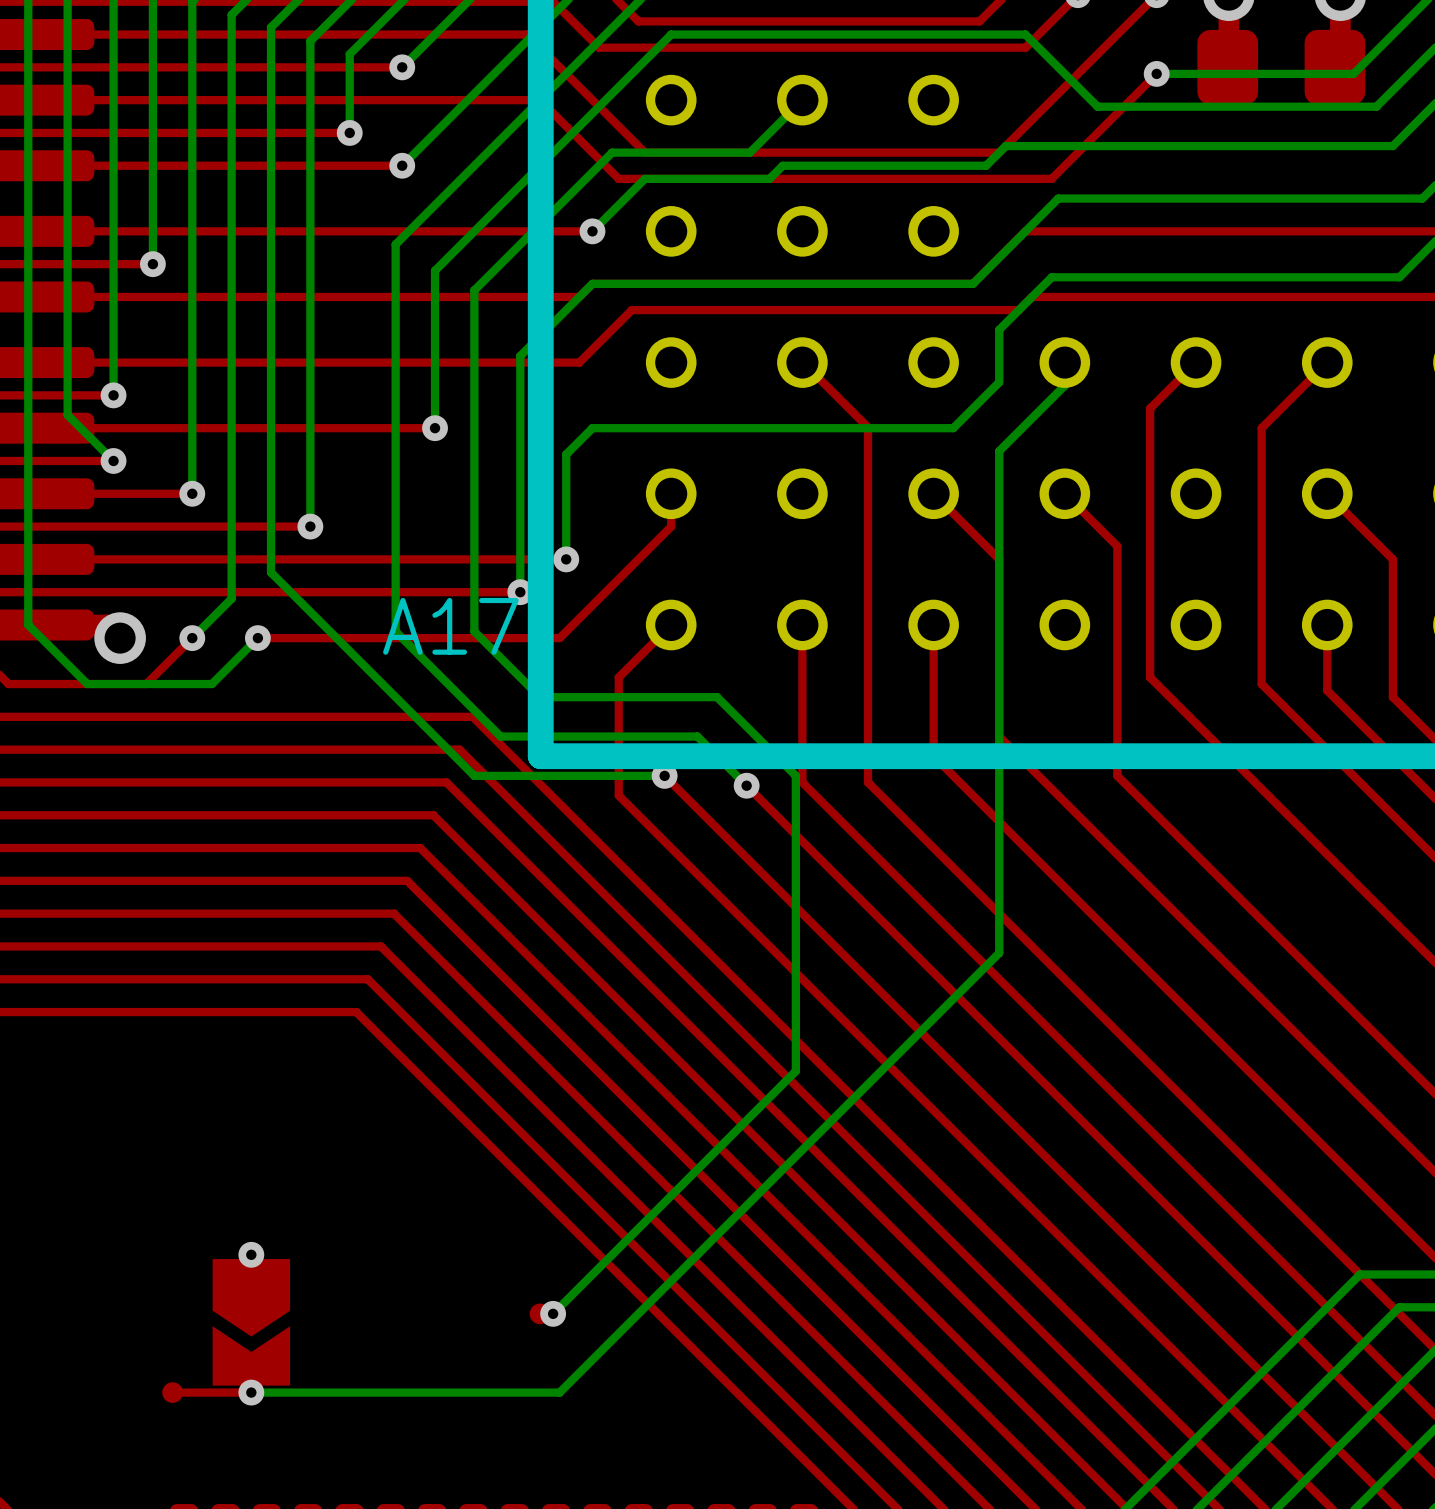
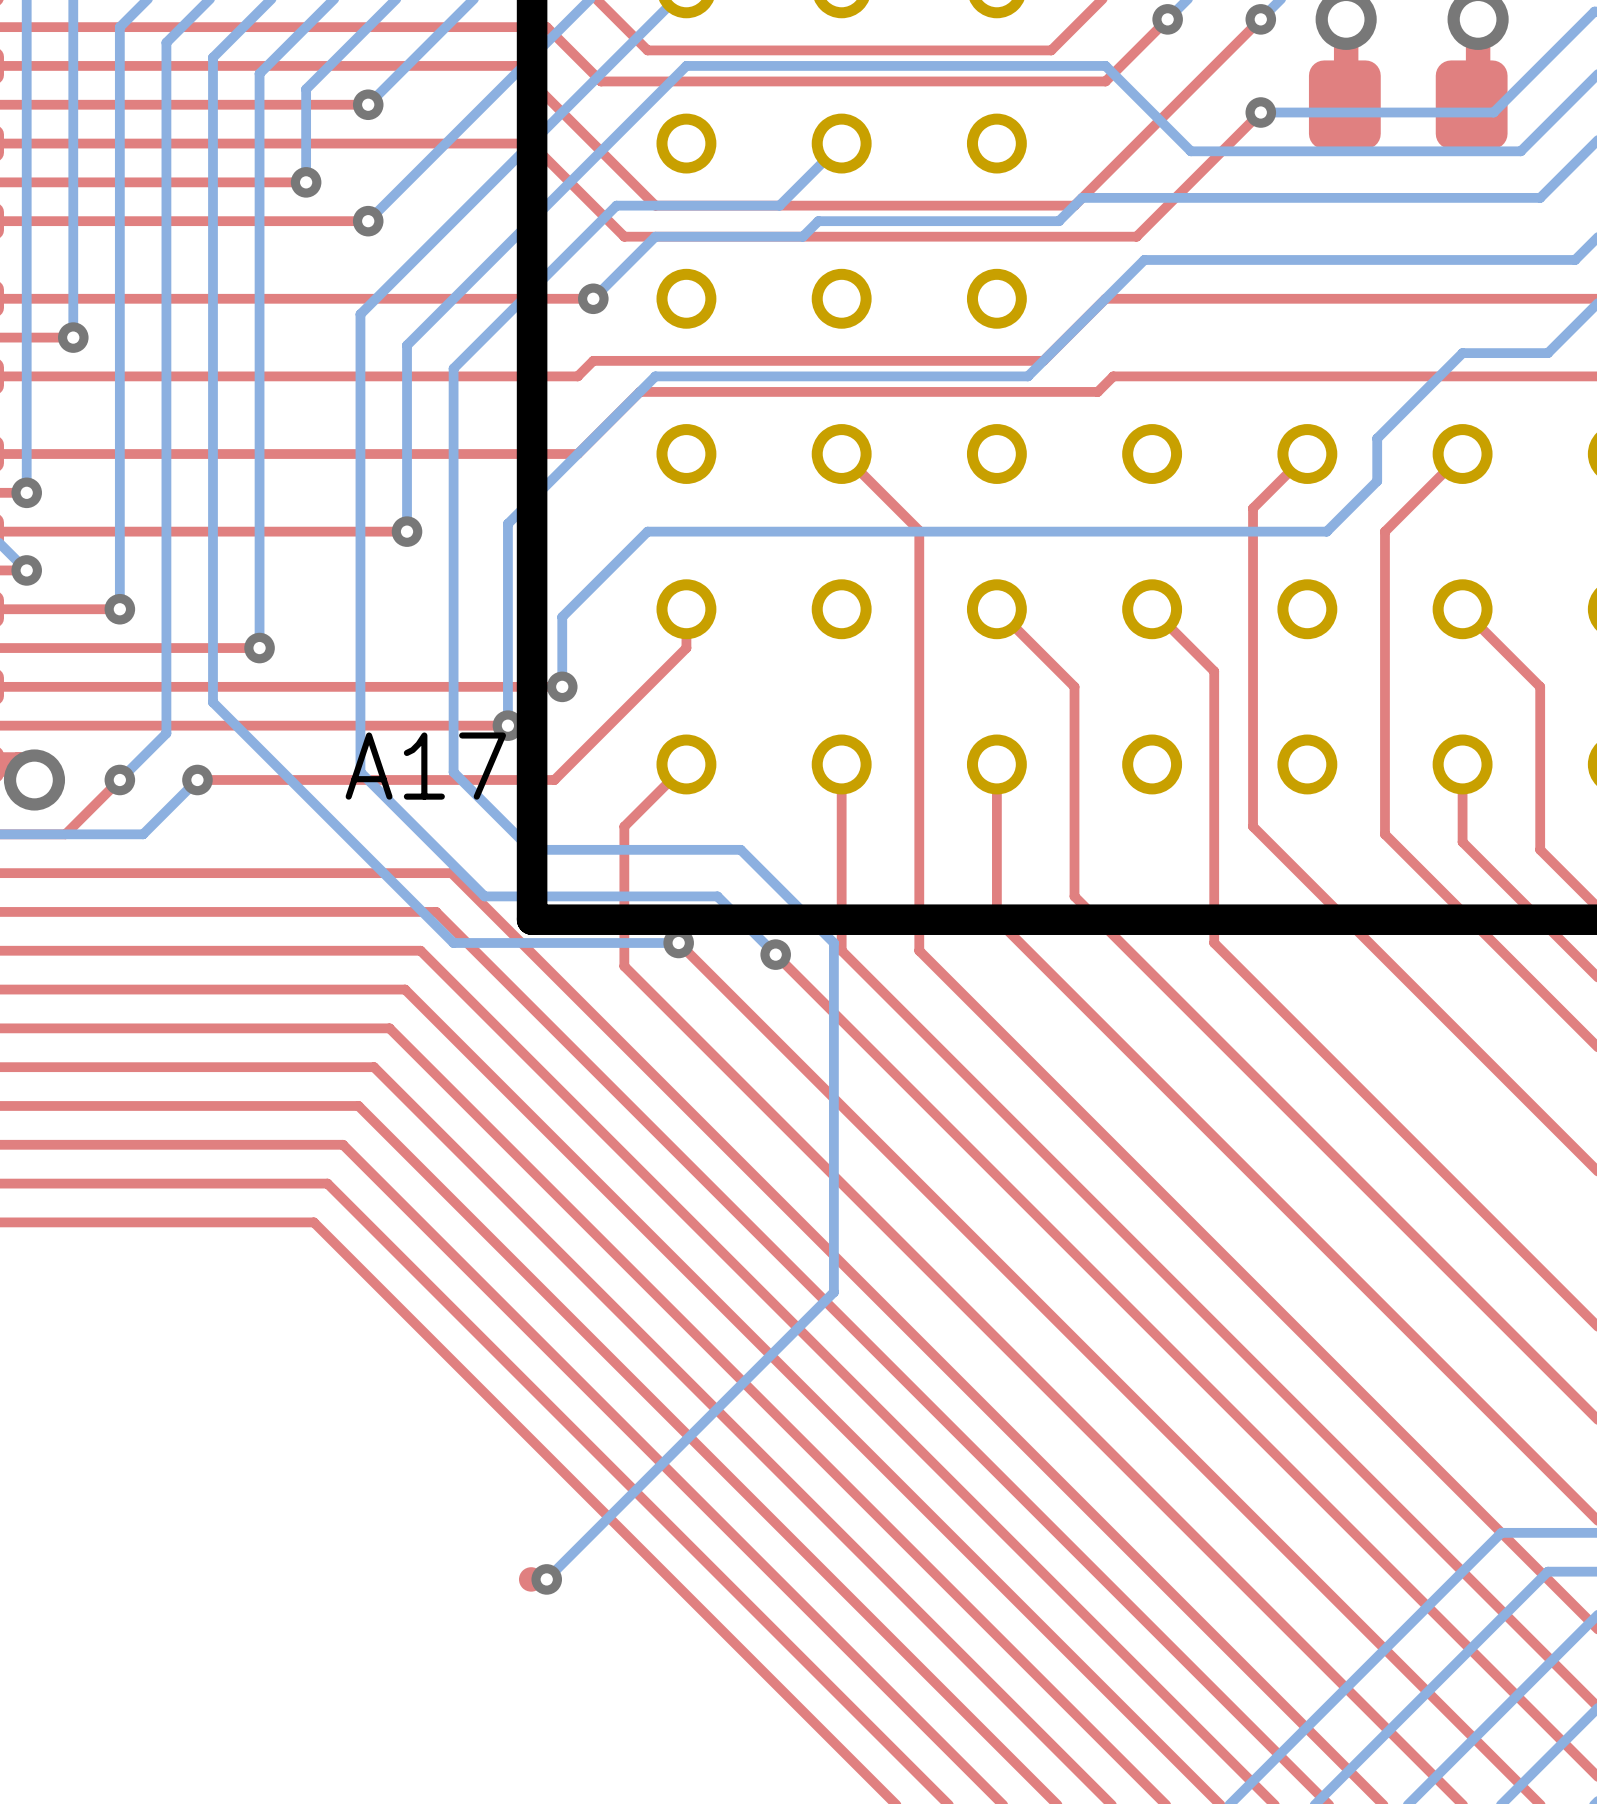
bottom track: (1327, 277) (1051, 277) (999, 329) (999, 382) (953, 428) -> (1462, 353) (1377, 438) (1377, 481) (1326, 531) (1020, 531)
bottom track: (972, 283) (592, 283) (520, 356) (520, 421) -> (1043, 360) (1027, 376) (655, 376) (507, 523)
bottom track: (1064, 362) (1064, 385) (999, 451) (999, 953) (559, 1392) (251, 1392) -> none
bottom track: (638, 428) (592, 428) (566, 454) (566, 500) -> (647, 531) (562, 617)
via: (251, 1254) -> none
part: (251, 1322) -> none
top track: (251, 1359) (251, 1392) (172, 1392) -> none
part: (172, 1392) -> none
via: (251, 1392) -> none

